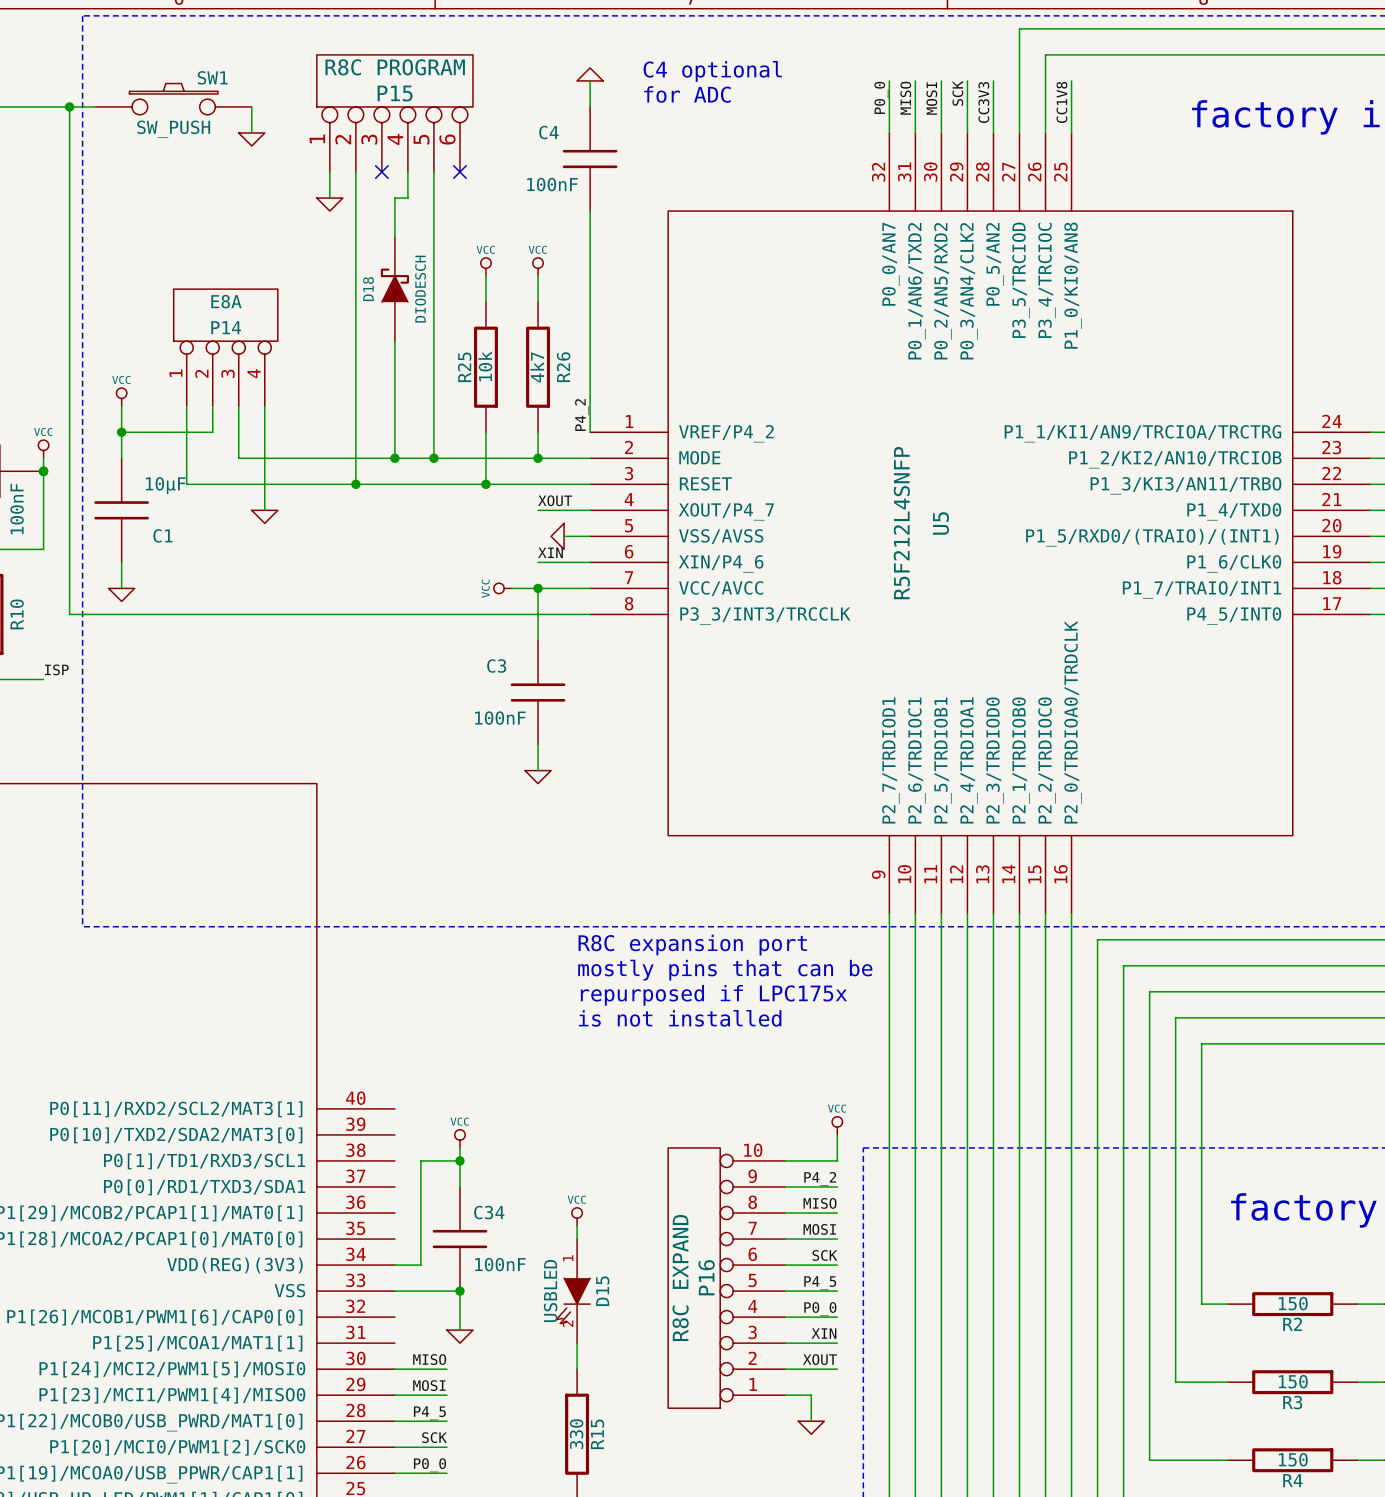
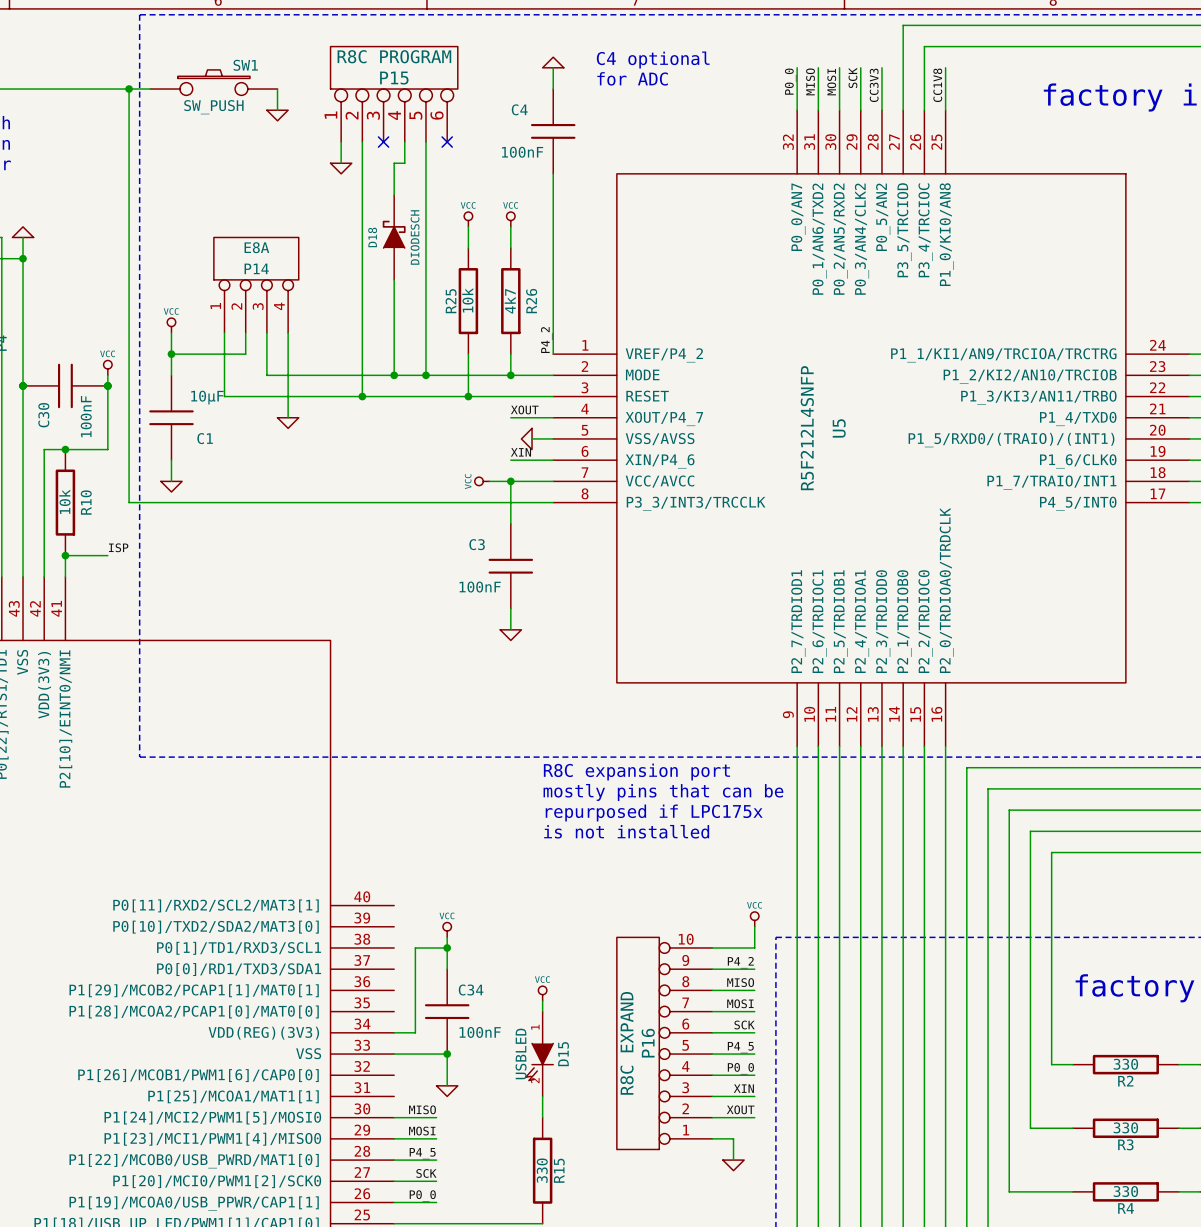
R2 value: 150 (1293, 1303) -> 330 (1125, 1064)
R3 value: 150 (1293, 1381) -> 330 (1125, 1127)
R4 value: 150 (1293, 1459) -> 330 (1125, 1191)

